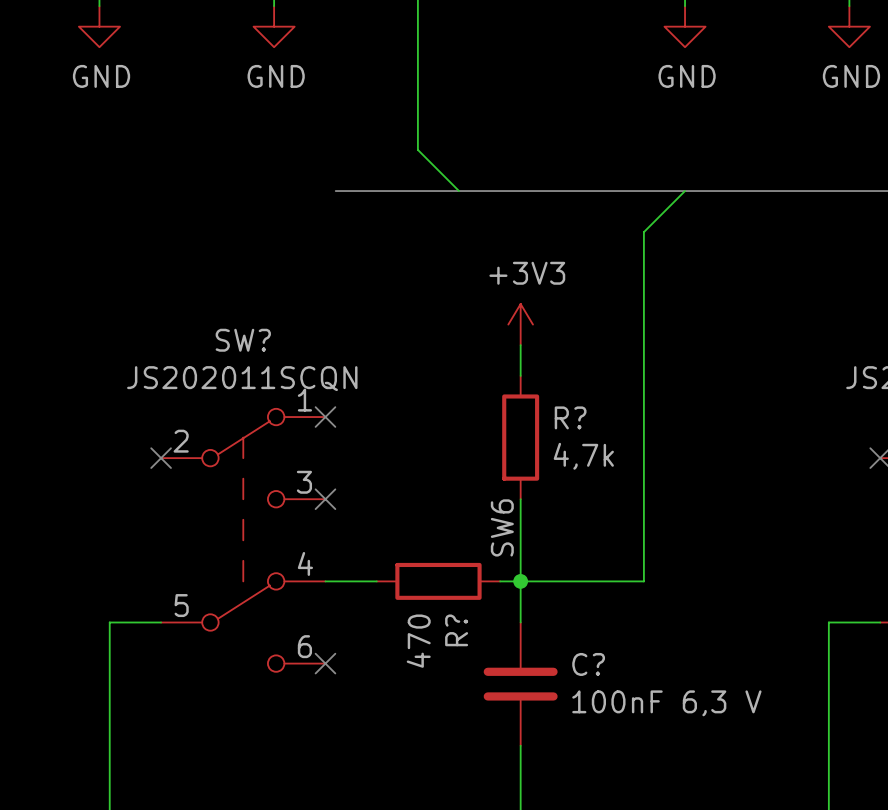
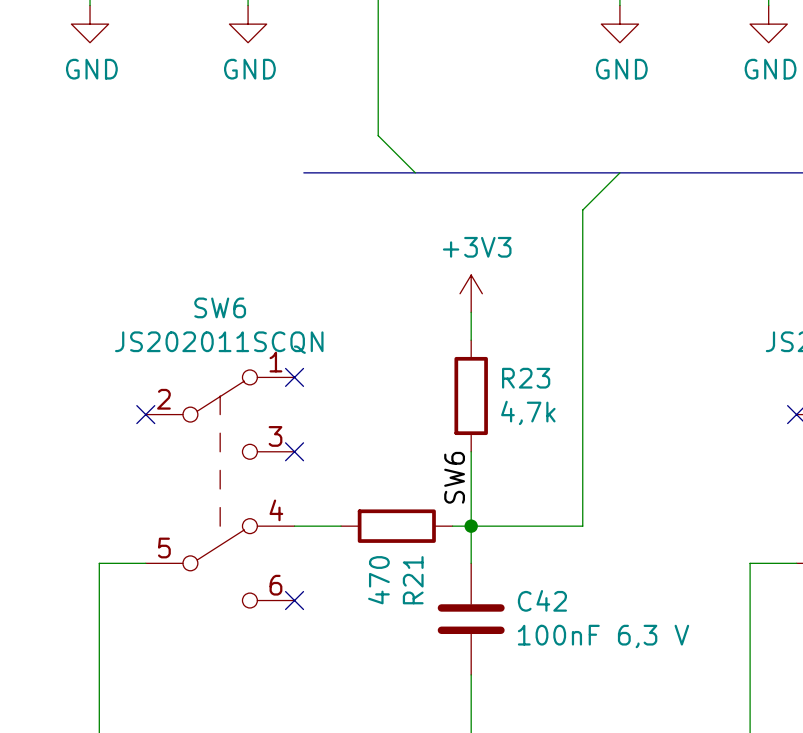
SW? name: SW? (243, 340) -> SW6 (220, 307)
R? name: R? (570, 417) -> R23 (526, 378)
R? name: R? (456, 630) -> R21 (413, 580)
C? name: C? (588, 664) -> C42 (542, 600)

